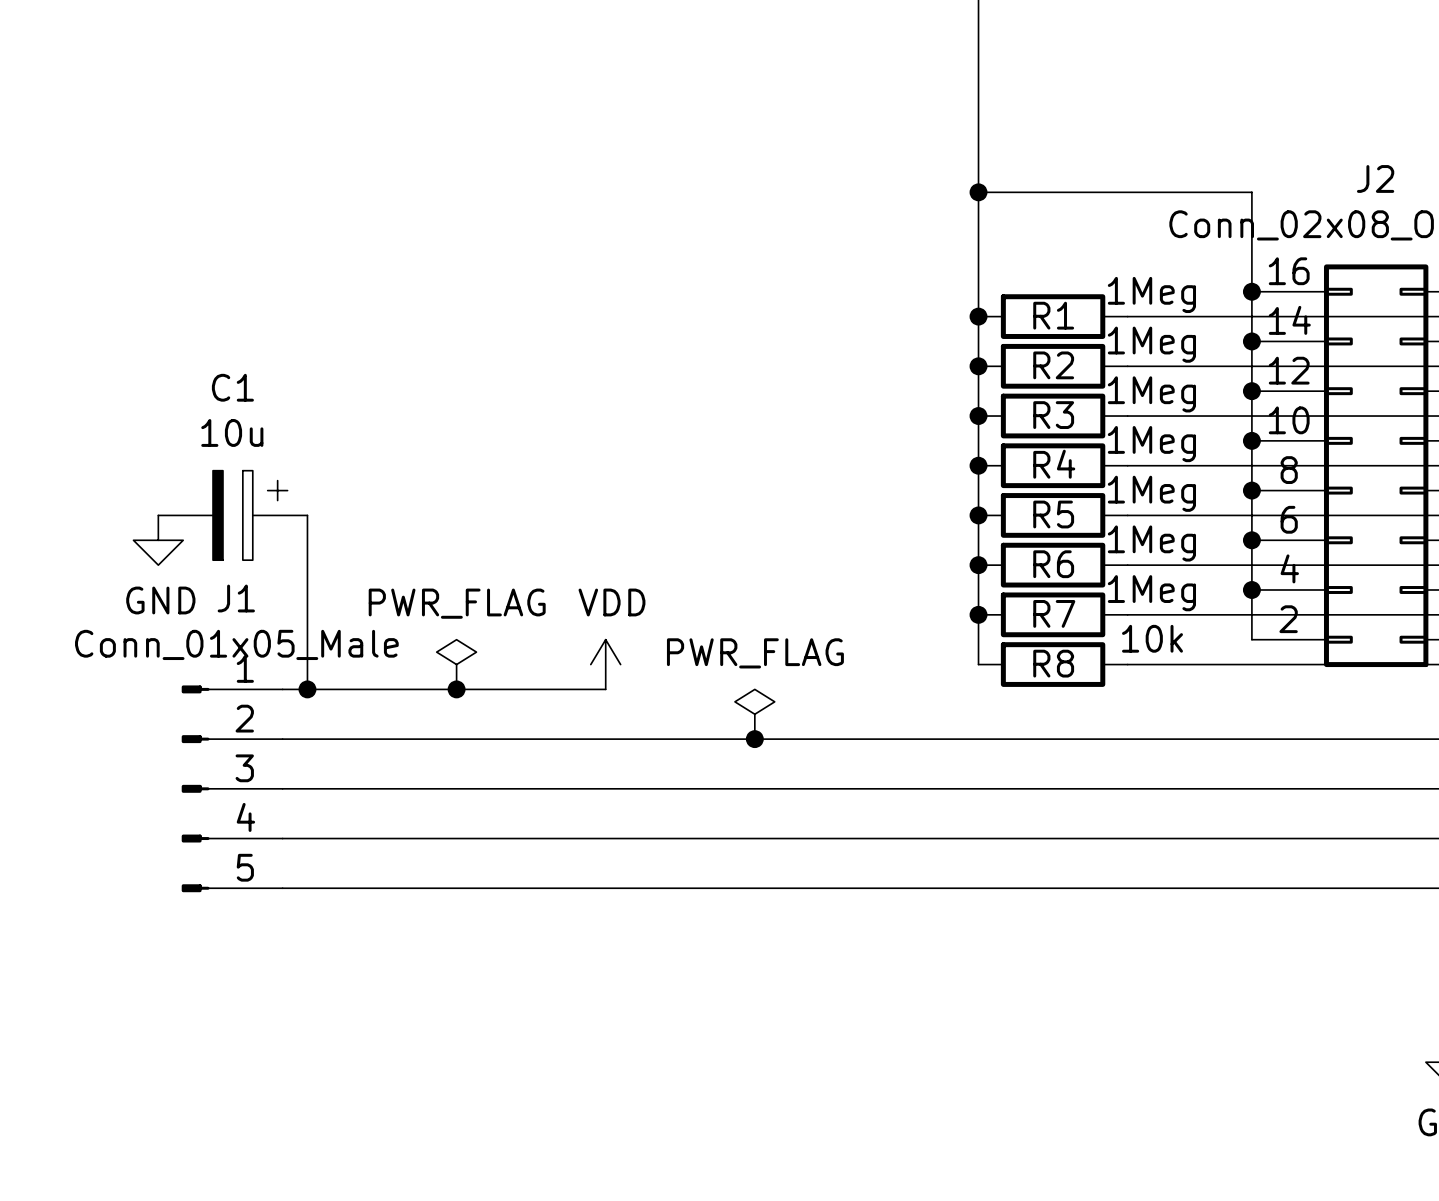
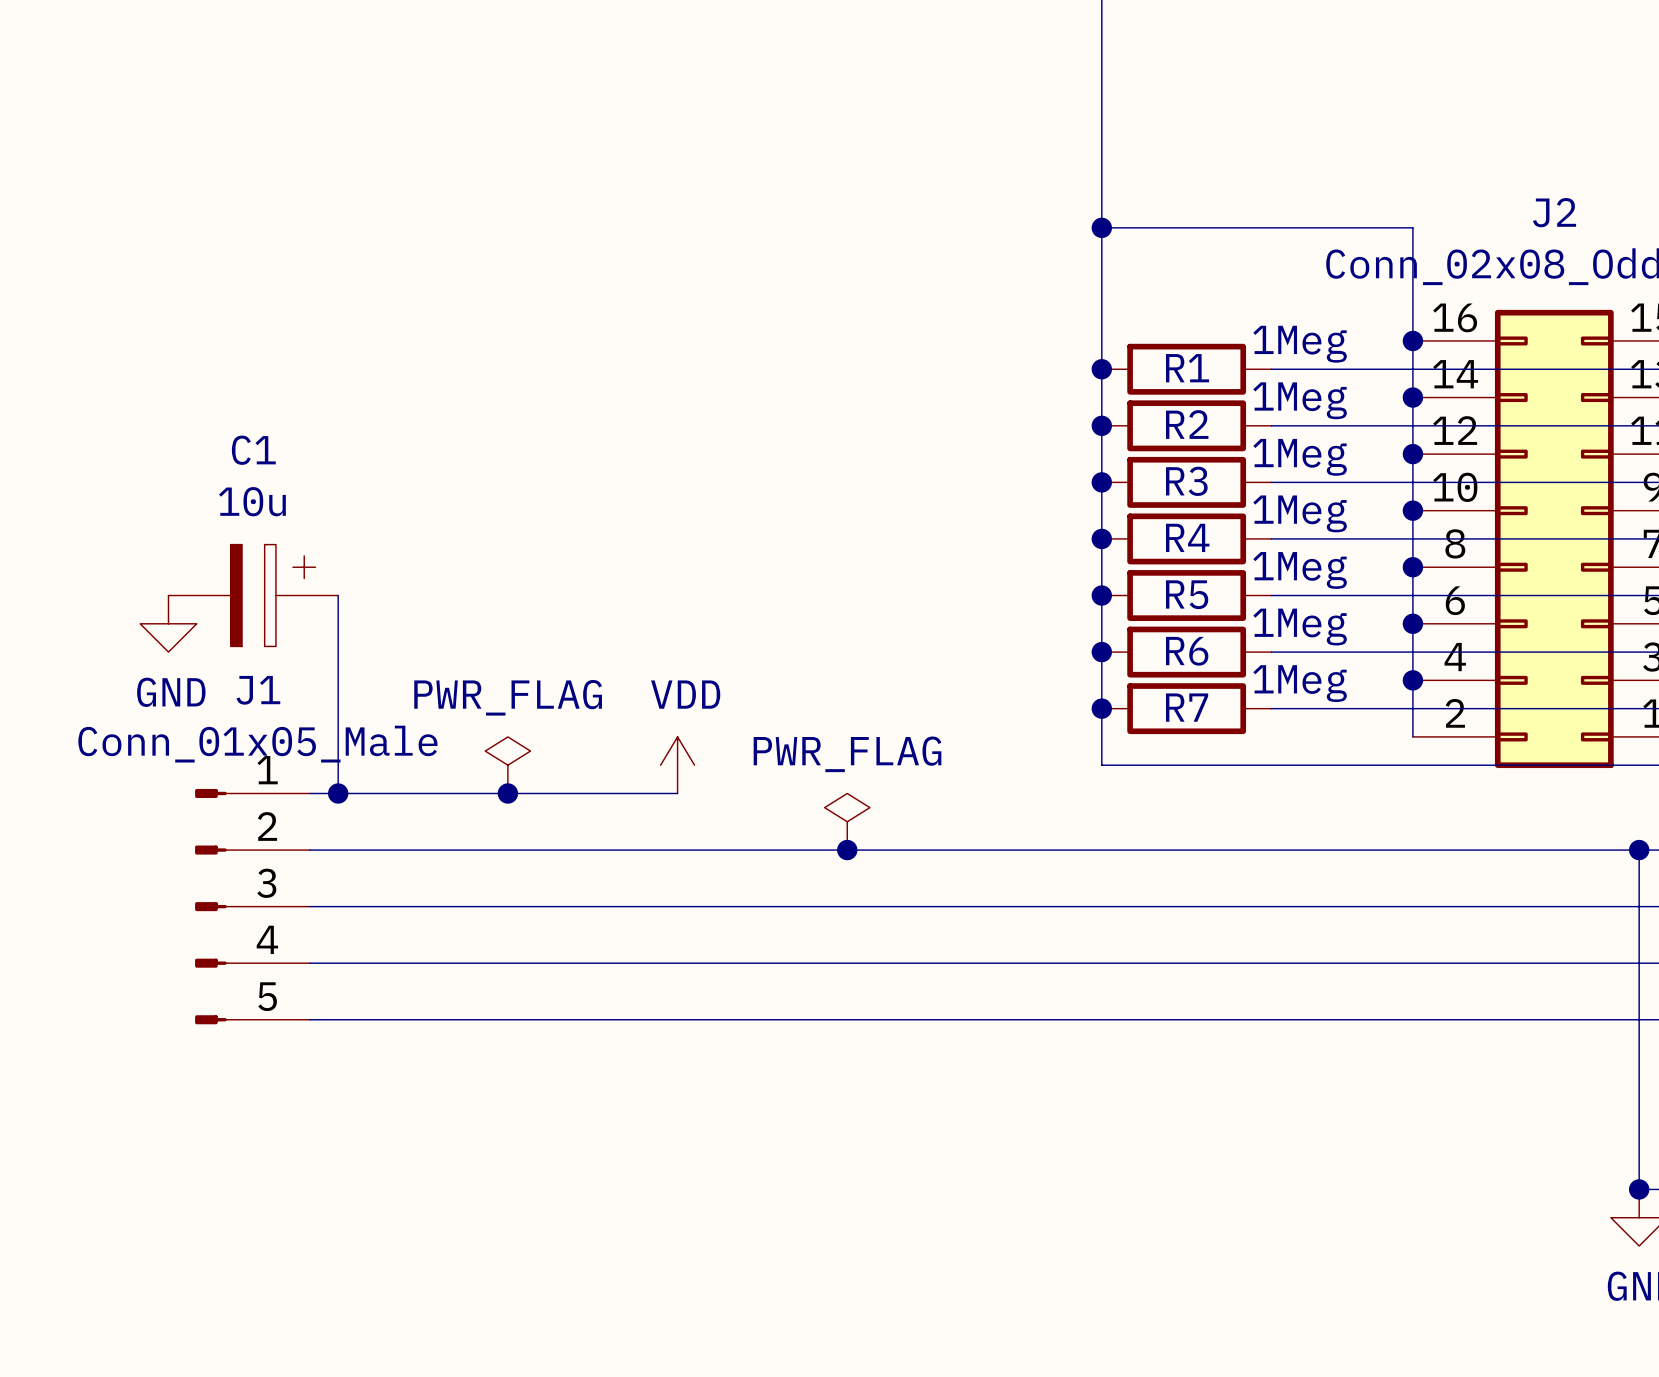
wire: none -> (1101, 765) (1271, 765)
R8: 10k (1053, 664) -> none

